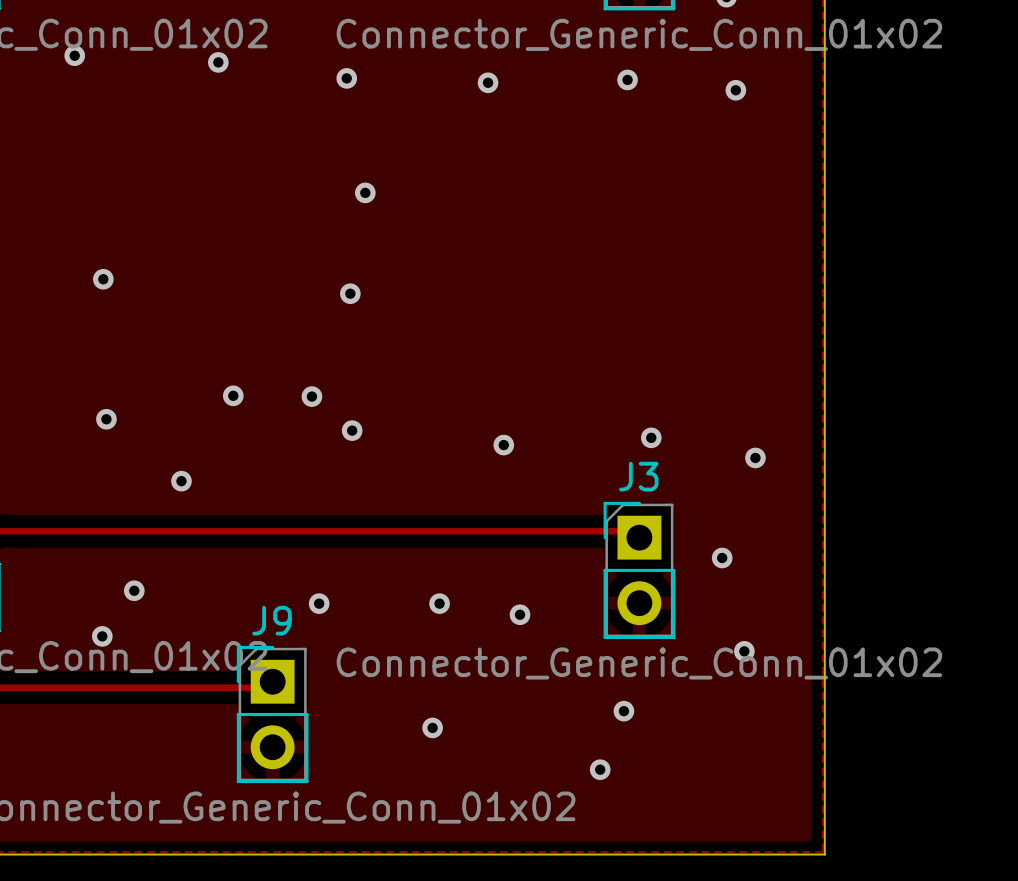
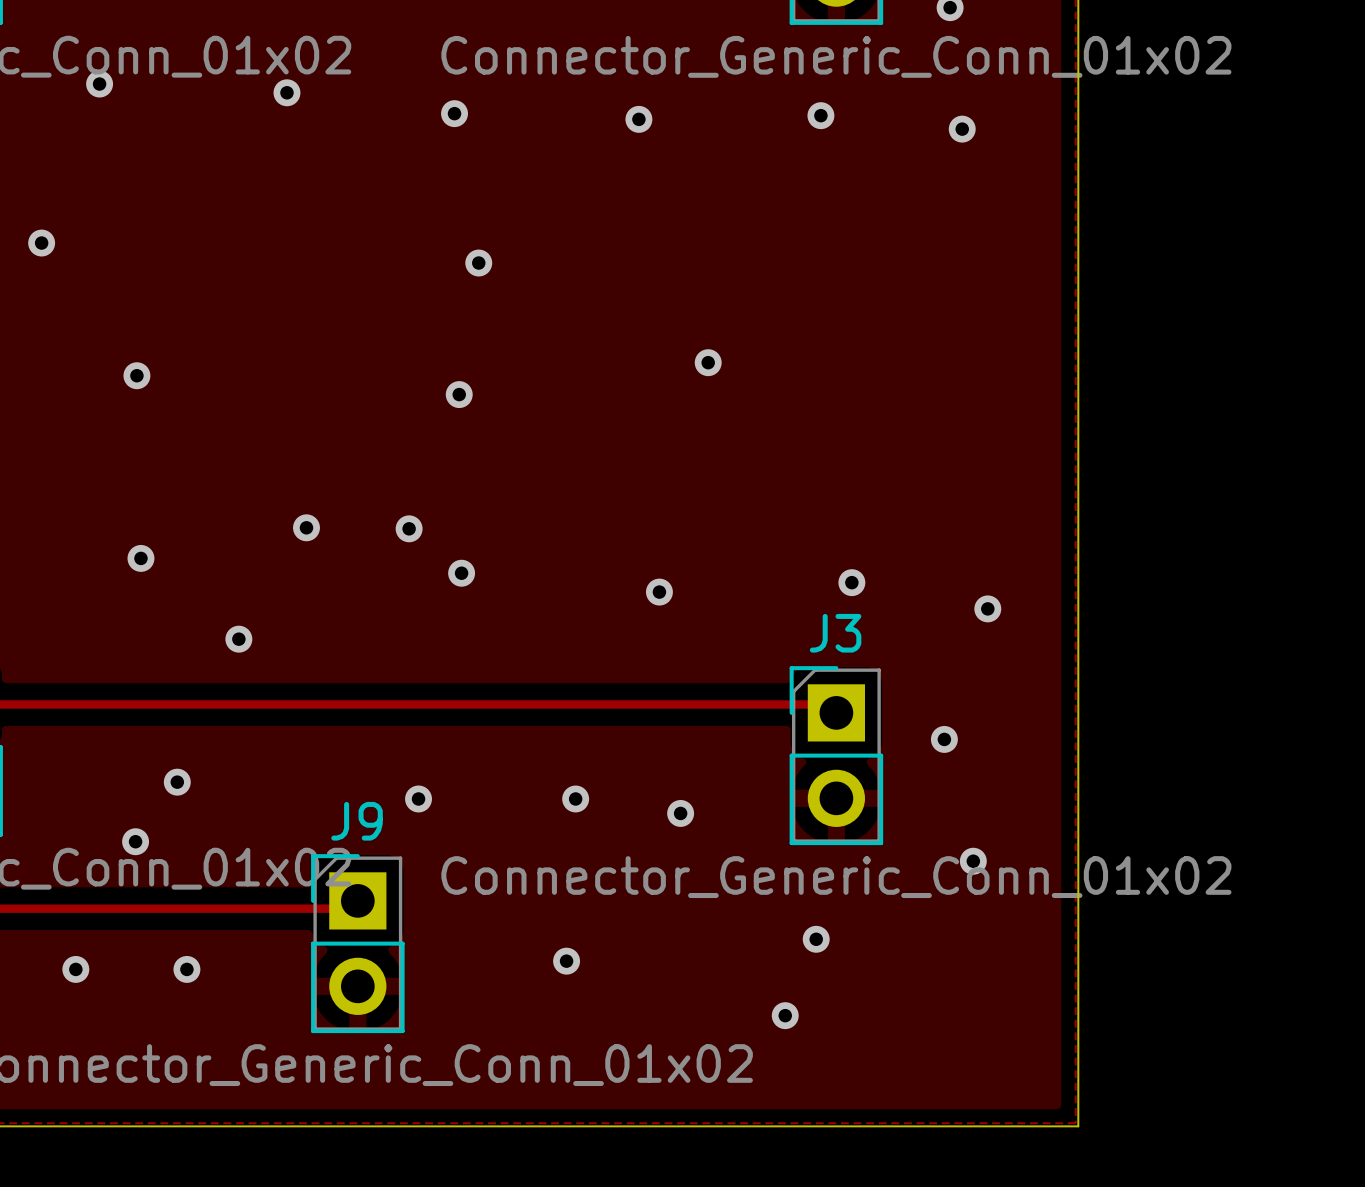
via: none -> (41, 243)
via: none -> (708, 362)
via: none -> (75, 969)
via: none -> (186, 969)

